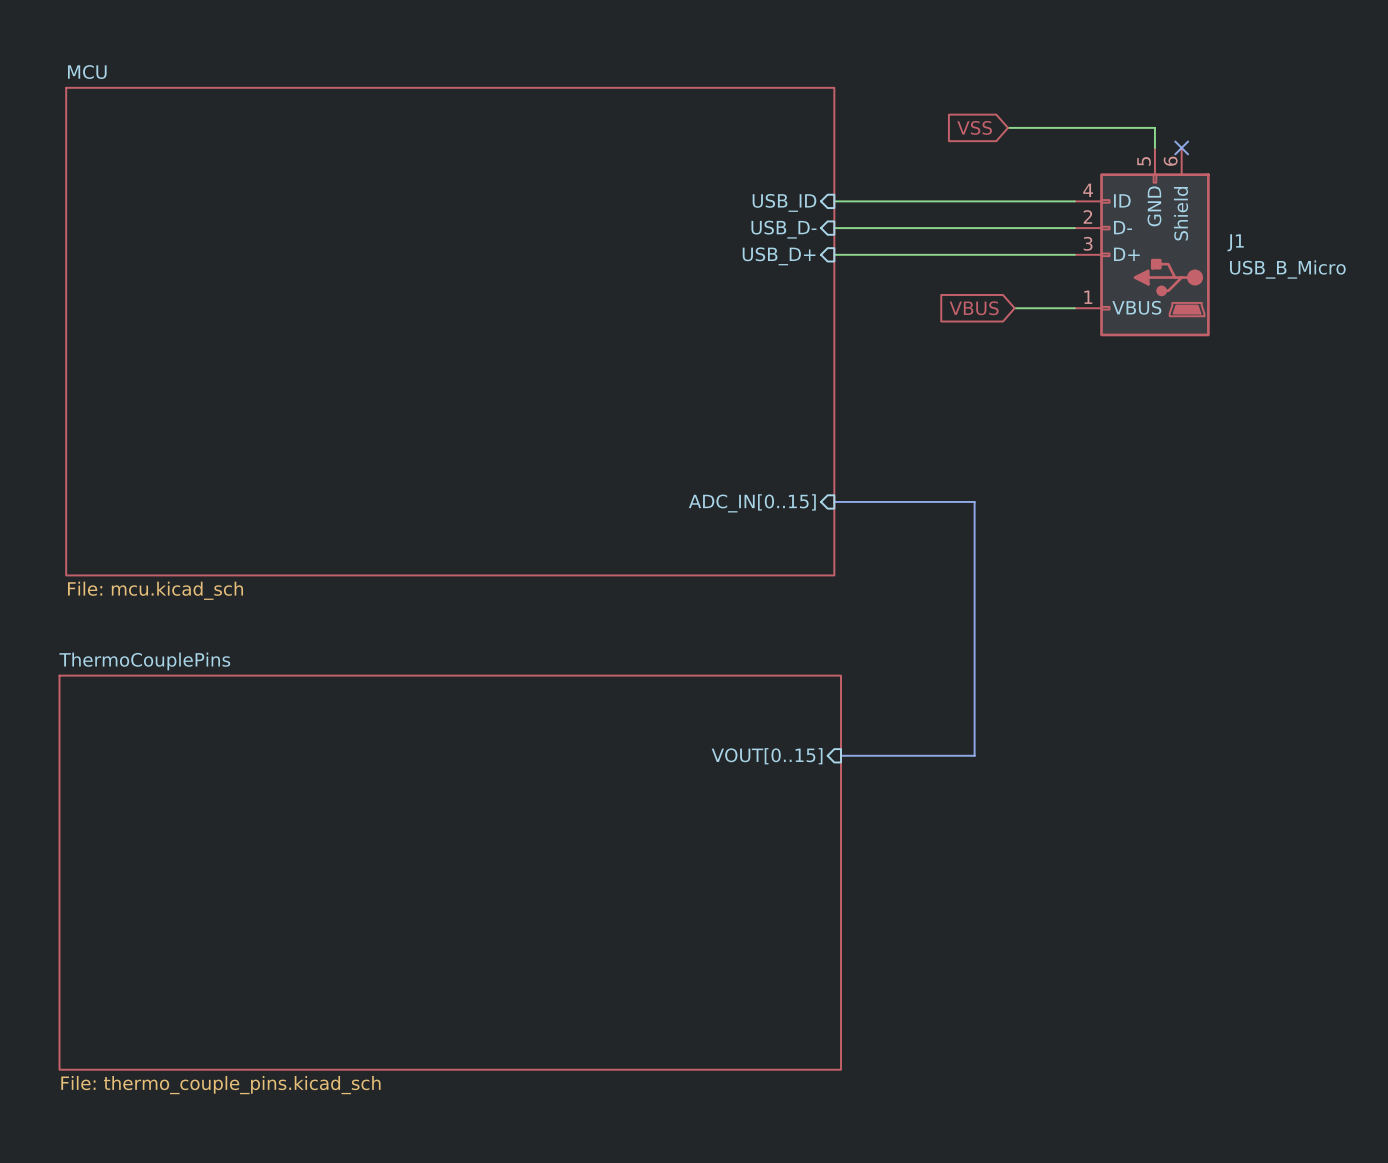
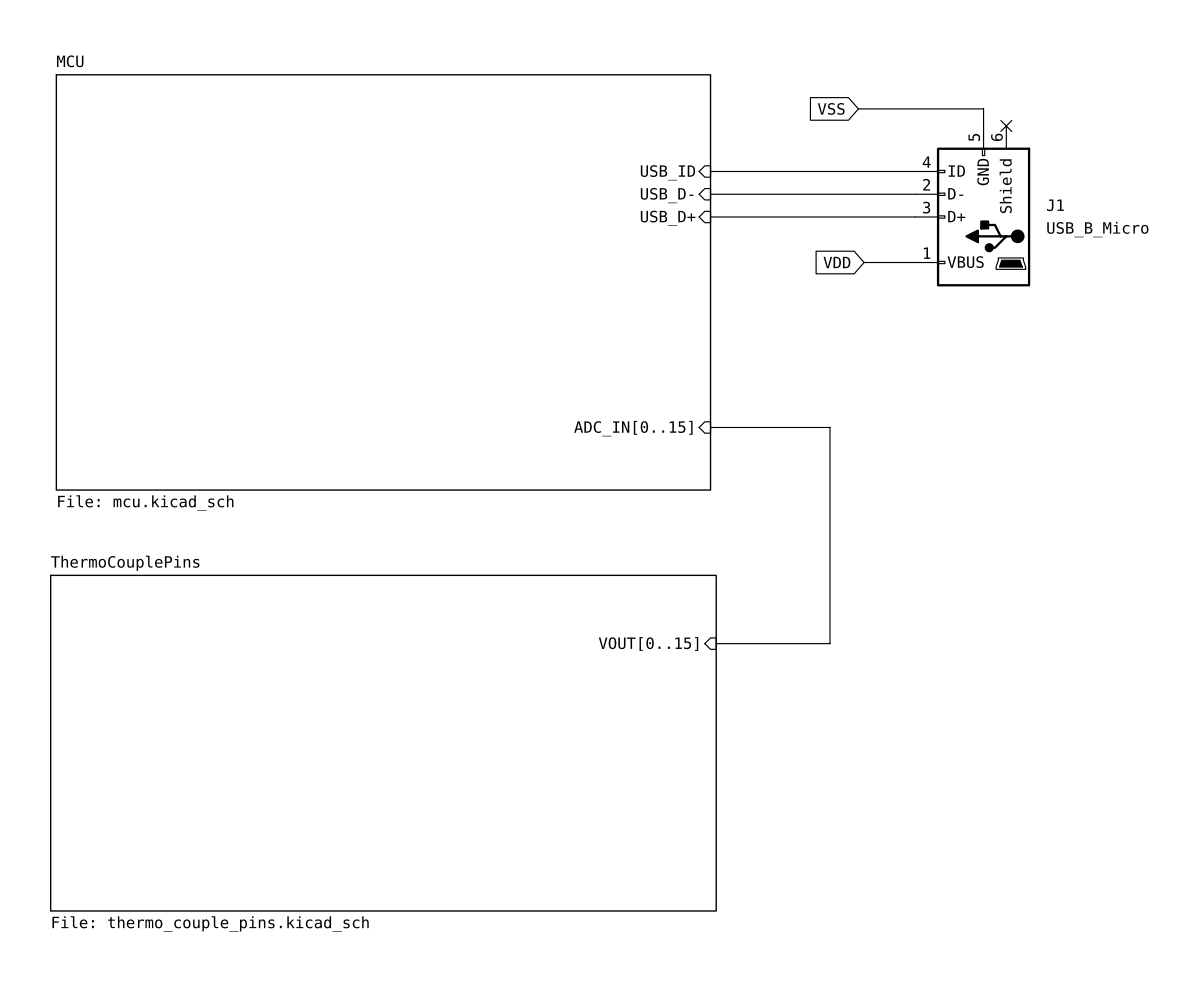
global label: VBUS (974, 308) -> VDD (836, 262)

